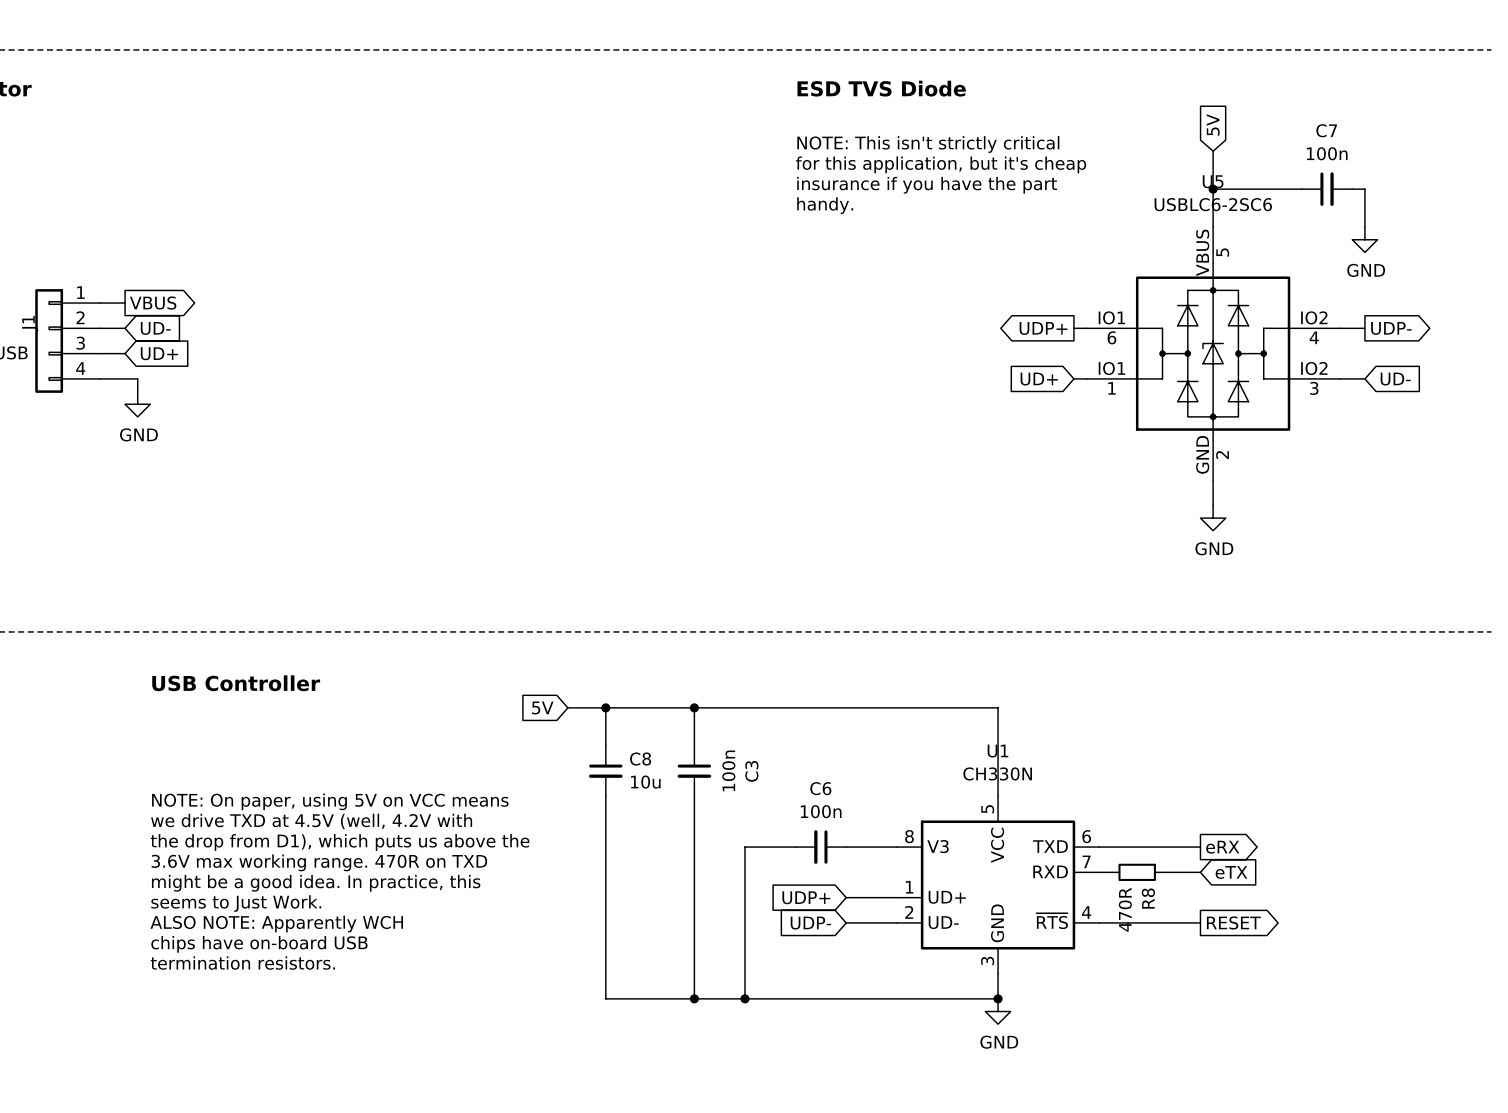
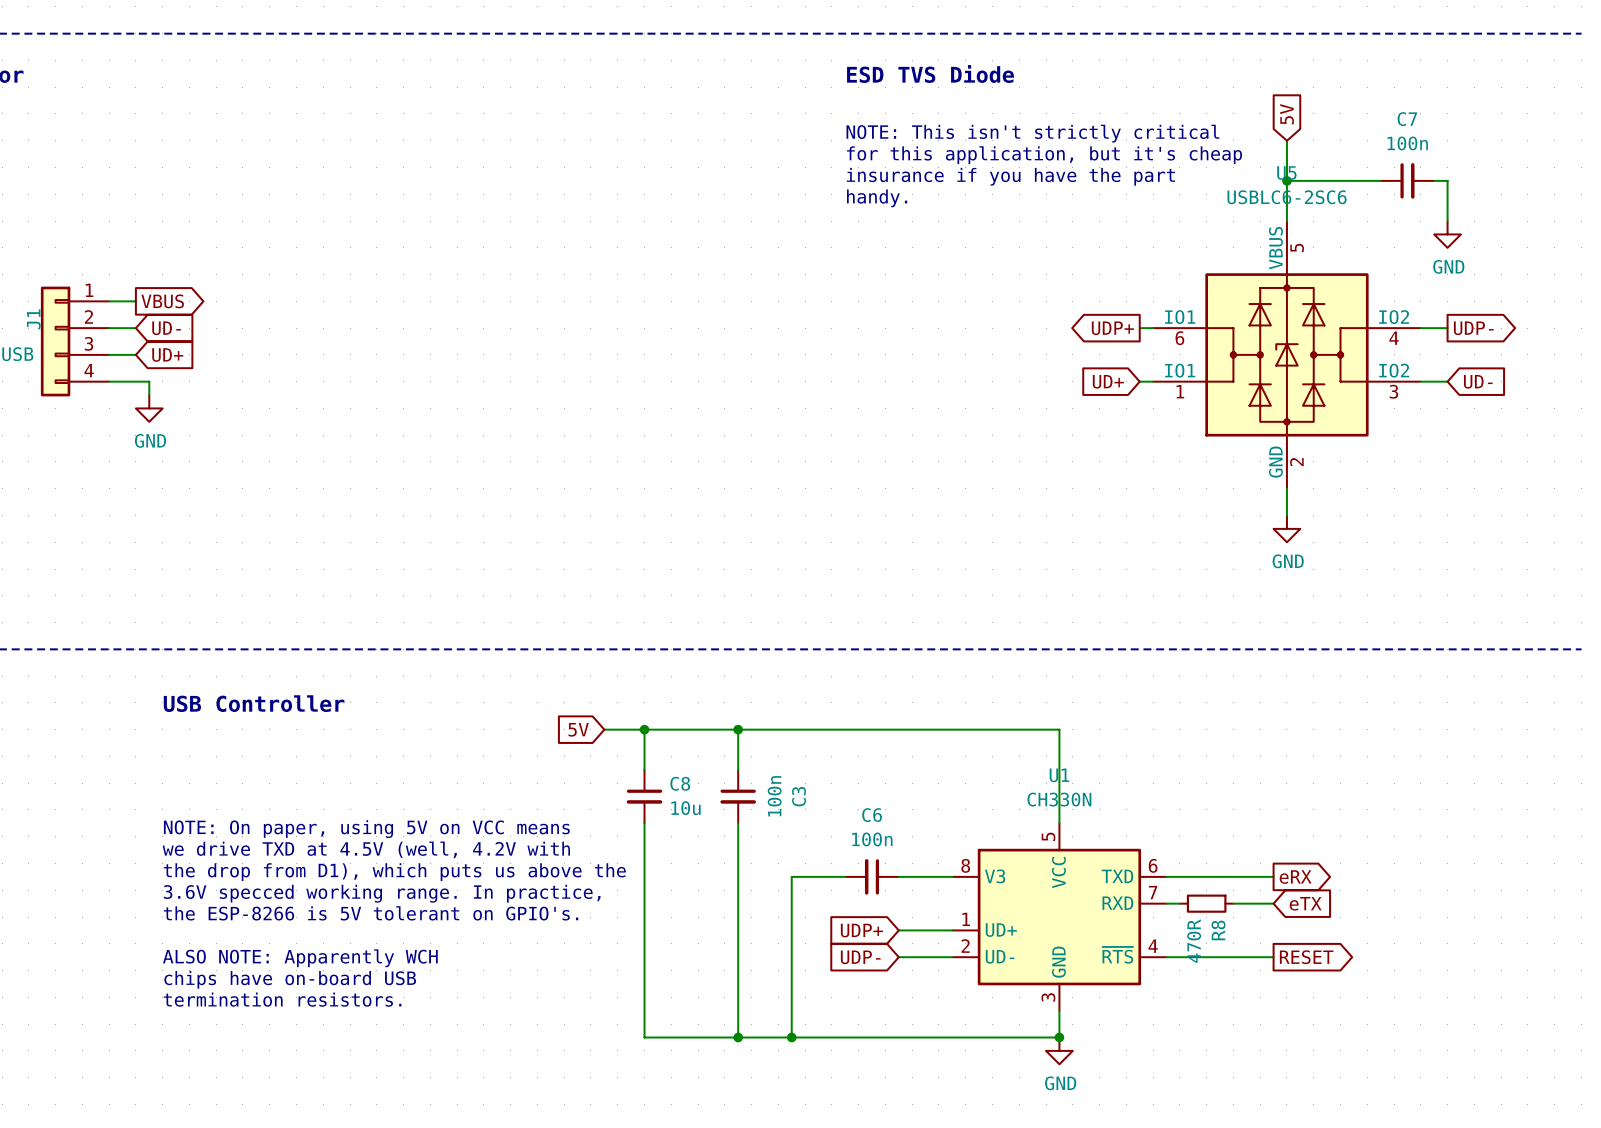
text: 3.6V max working range. 470R on TXD (319, 862) -> 3.6V specced working range. In practice, (382, 893)
text: might be a good idea. In practice, this (316, 883) -> the ESP-8266 is 5V tolerant on GPIO's. (371, 913)
text: seems to Just Work. (236, 903) -> none

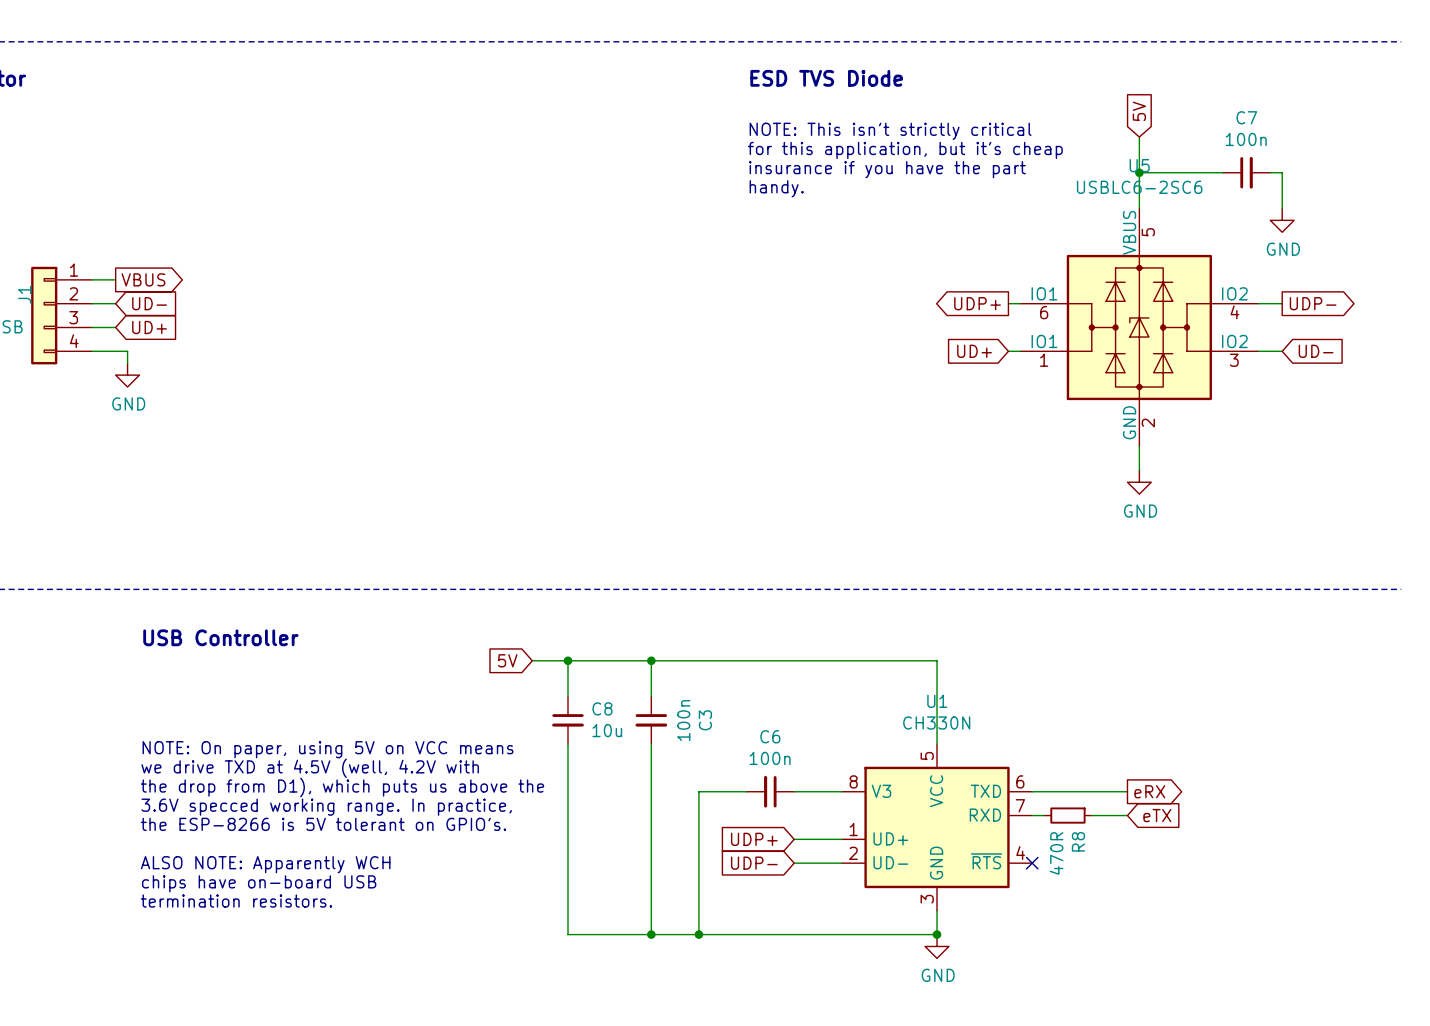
wire: (1166, 957) (1273, 957) -> none
no-connect mark: none -> (1032, 863)
global label: RESET (1306, 957) -> none

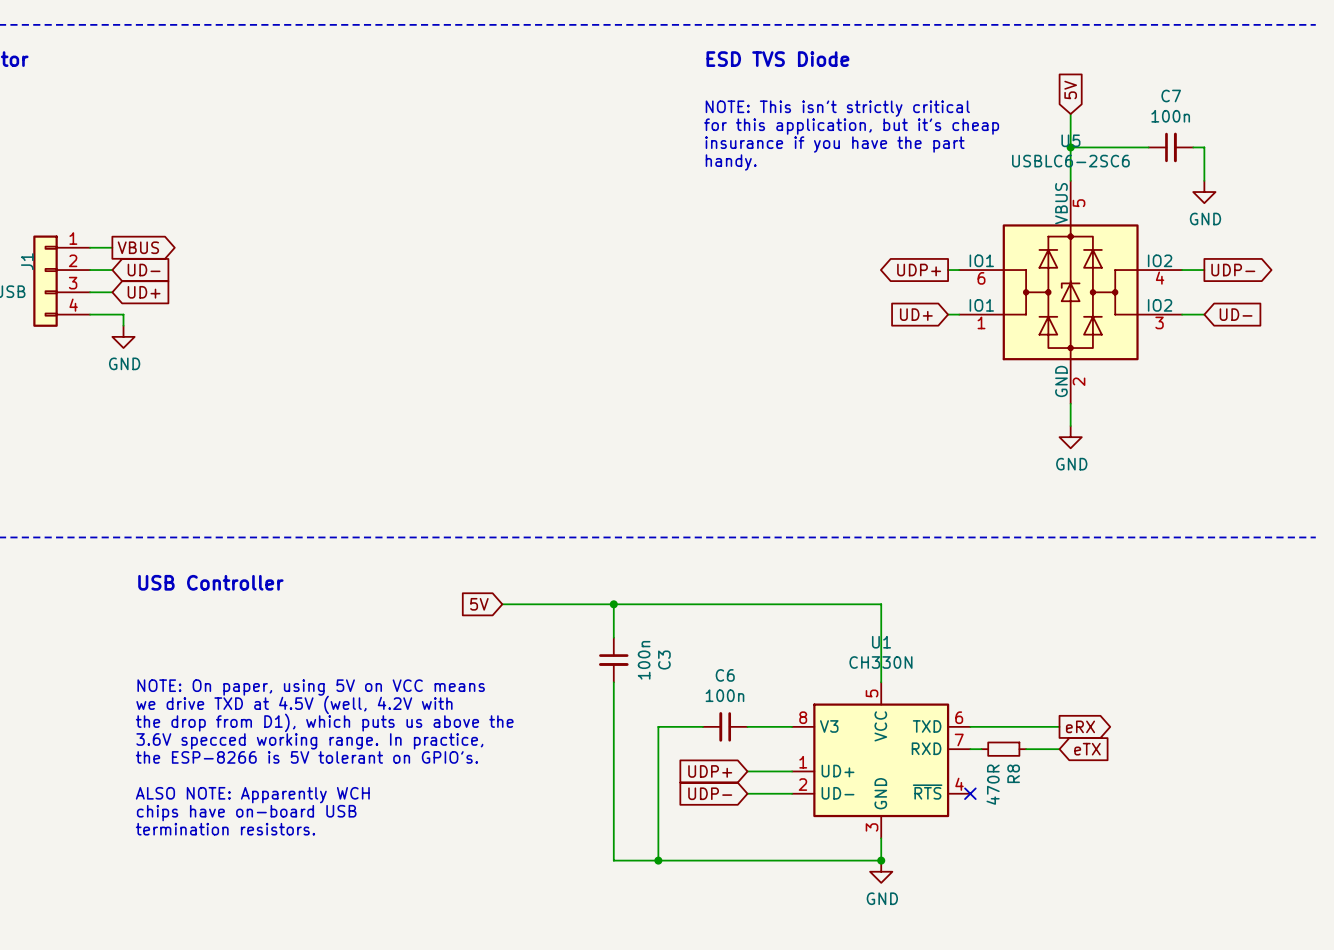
wire: (568, 660) (568, 696) -> none
junction: (568, 660) -> none
C8: 10u (568, 720) -> none
wire: (568, 744) (568, 934) (651, 934) -> none
junction: (651, 934) -> none

